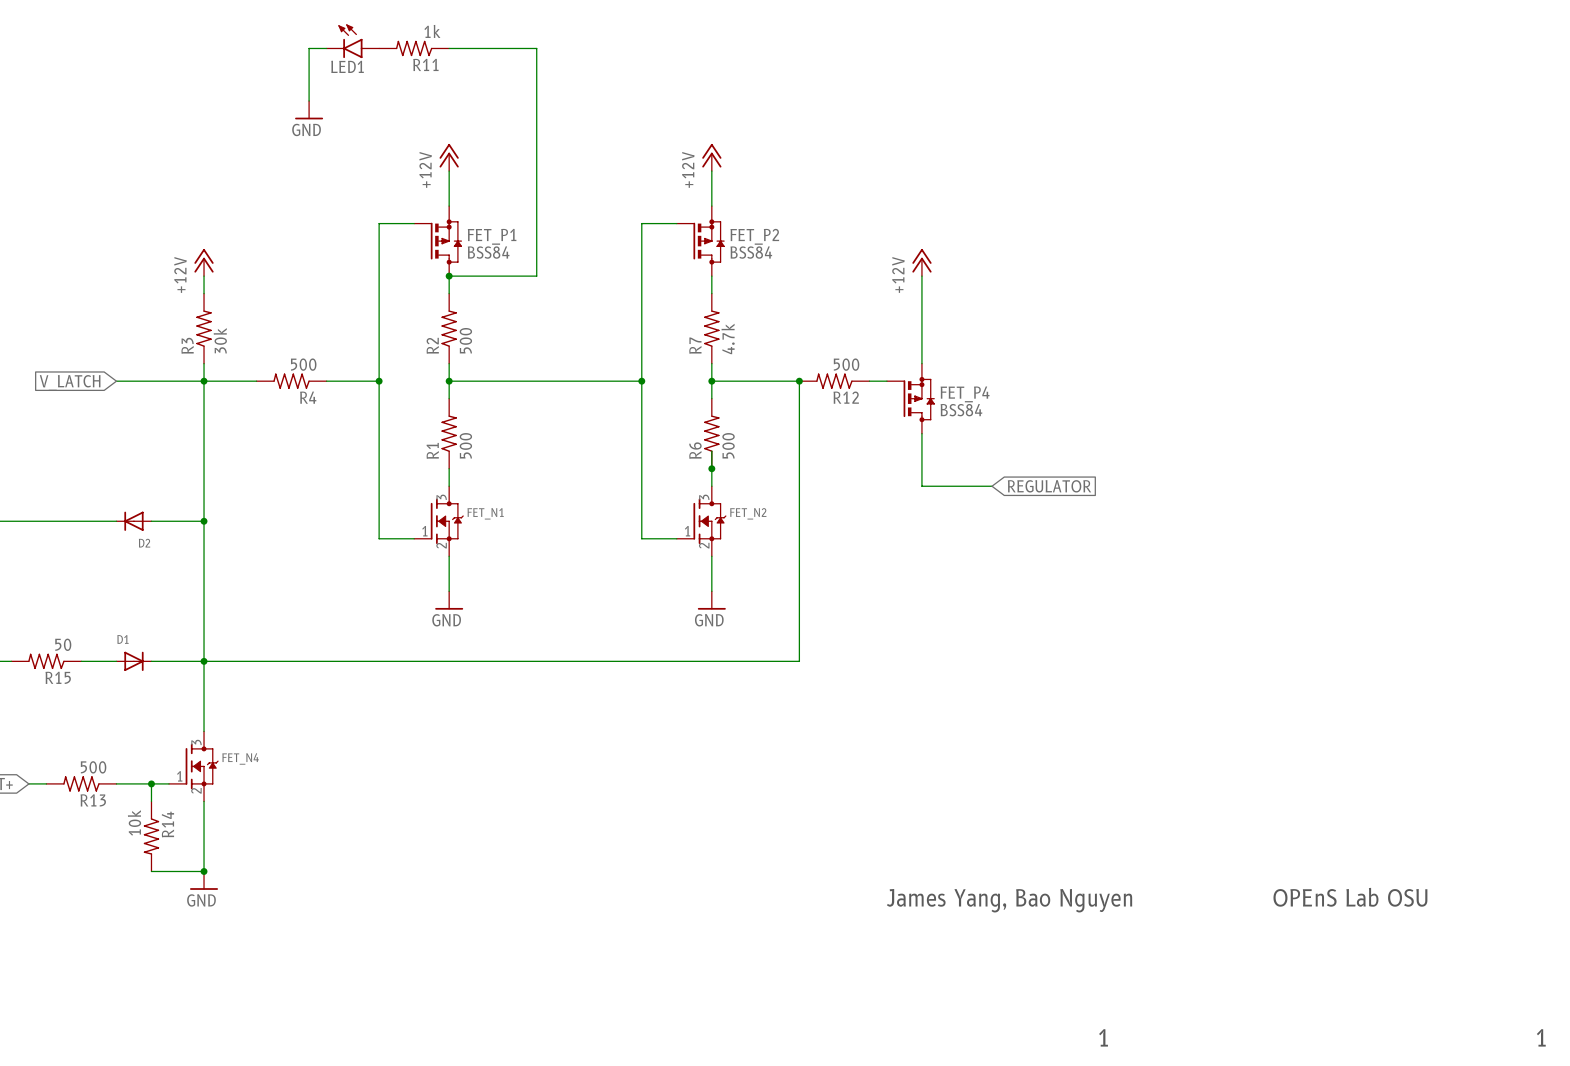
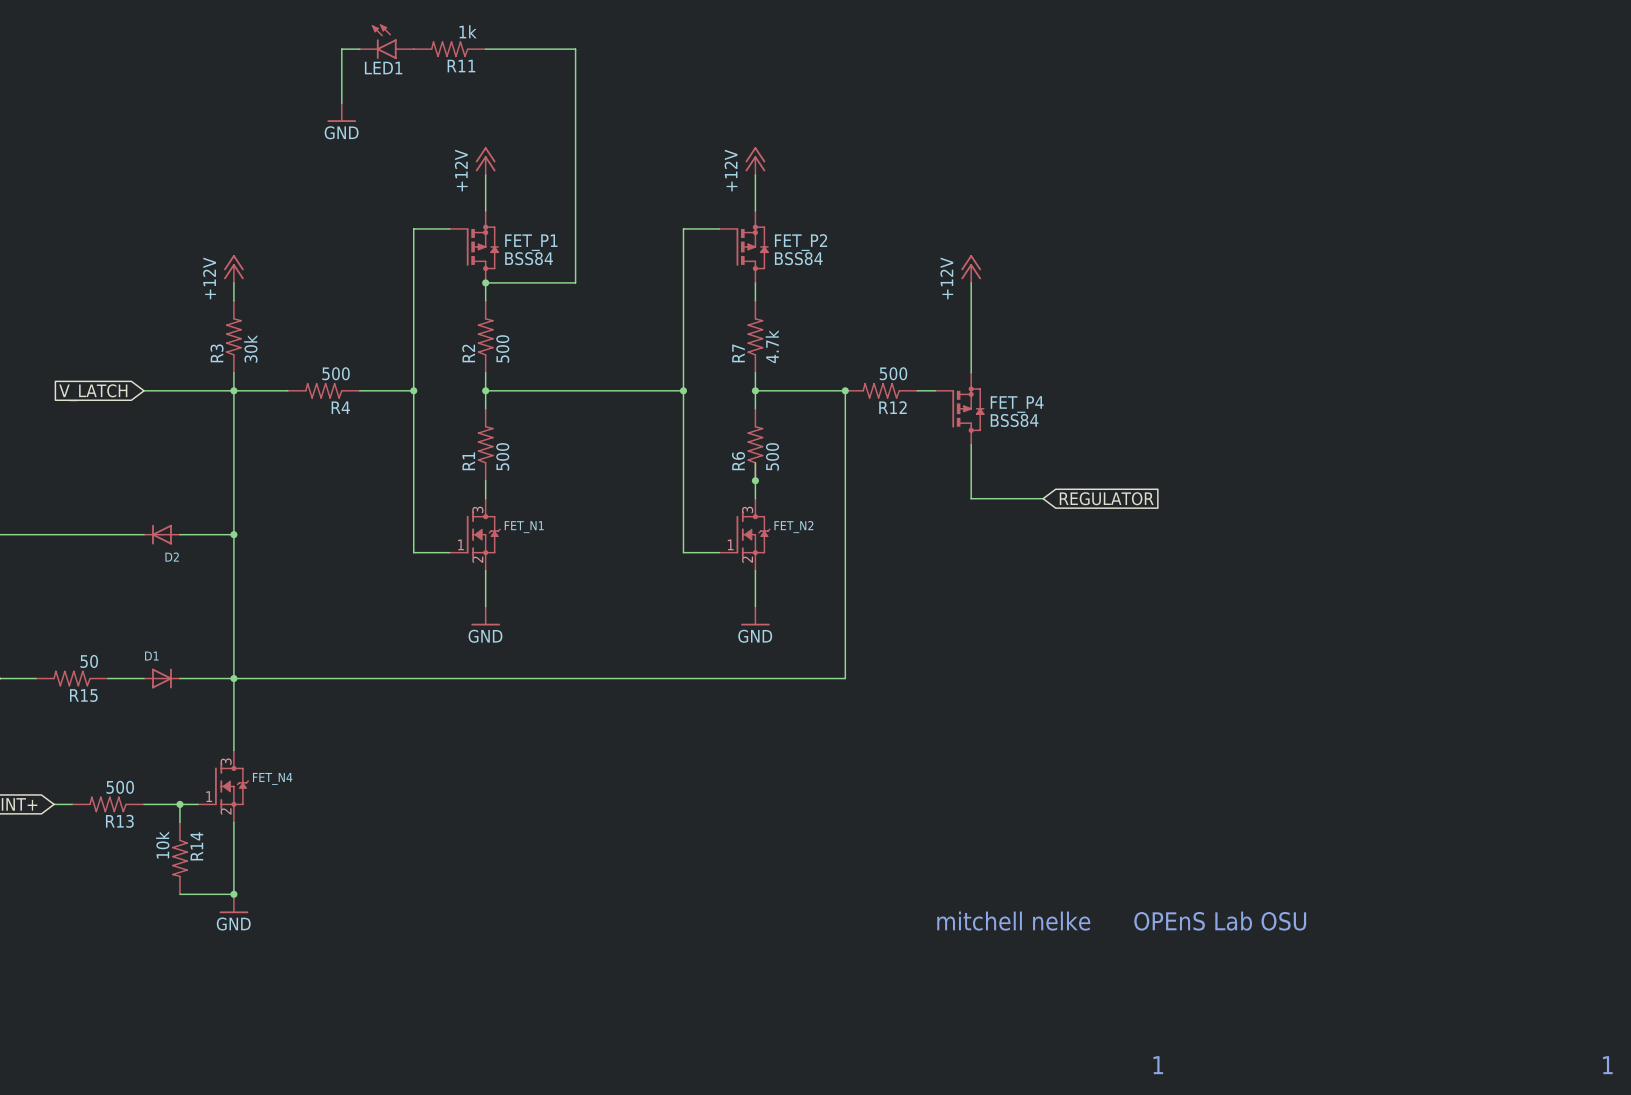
text: none -> OPEnS Lab OSU (1220, 921)
text: OPEnS Lab OSU (1350, 897) -> none
text: James Yang, Bao Nguyen (1009, 900) -> mitchell nelke (1013, 921)

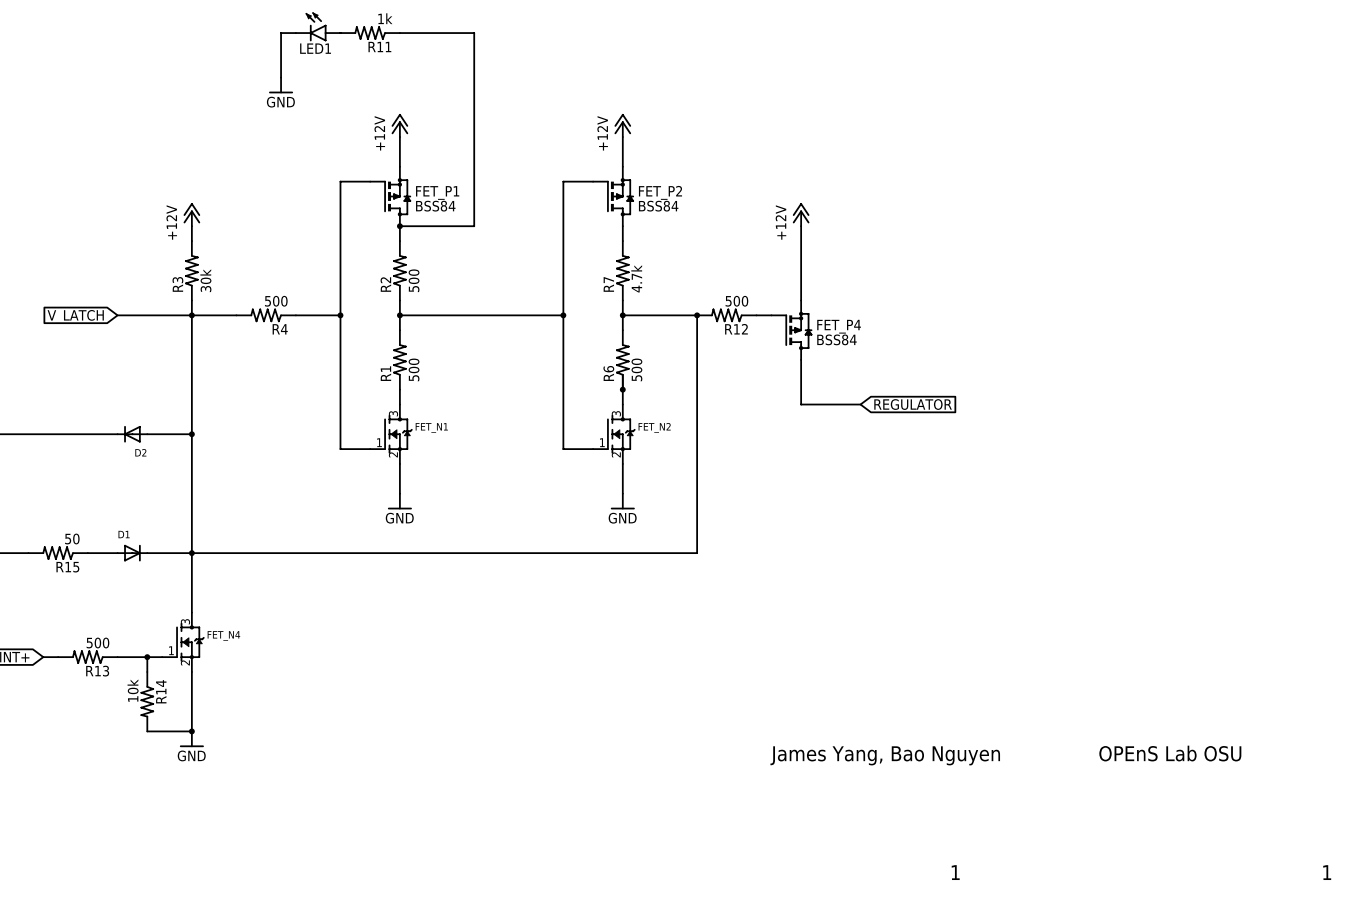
text: mitchell nelke (1013, 921) -> James Yang, Bao Nguyen (885, 755)
text: OPEnS Lab OSU (1220, 921) -> none
text: none -> OPEnS Lab OSU (1170, 753)

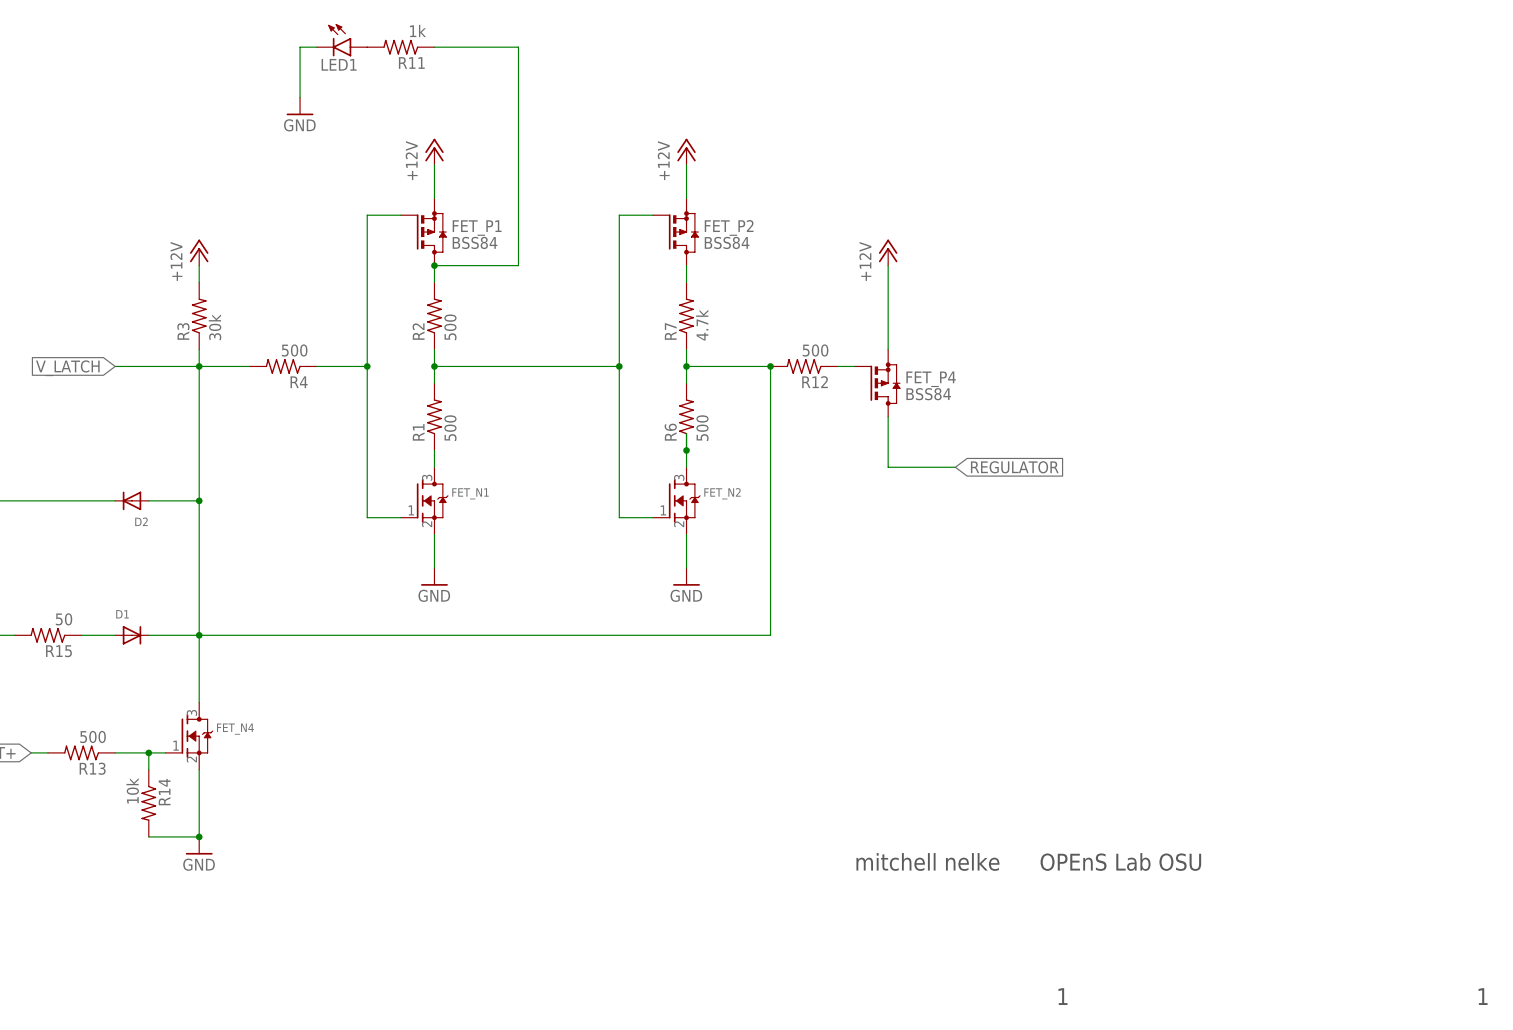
text: none -> OPEnS Lab OSU (1120, 861)
text: OPEnS Lab OSU (1170, 753) -> none
text: James Yang, Bao Nguyen (885, 755) -> mitchell nelke (927, 861)

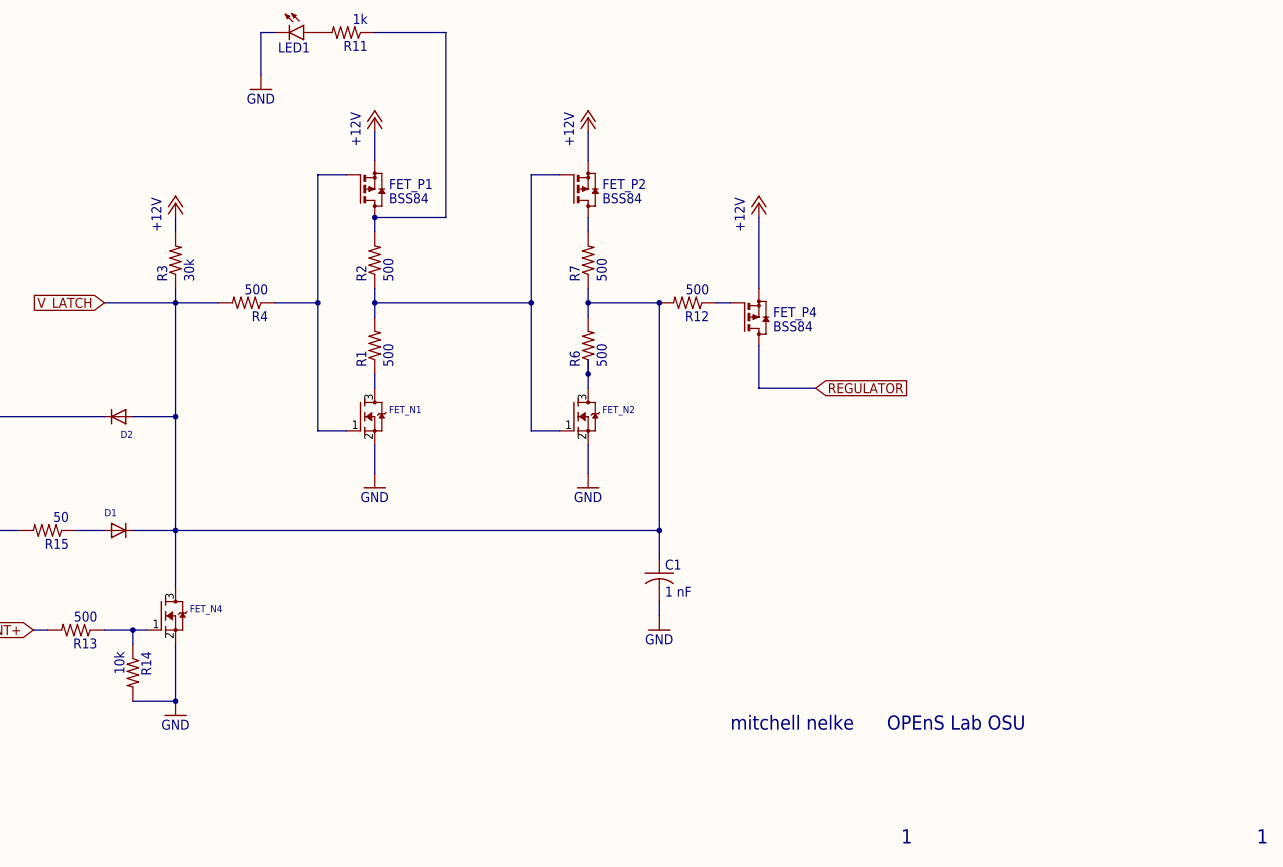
R7 value: 4.7k (702, 325) -> 500 (601, 269)
wire: none -> (659, 530) (659, 558)
junction: none -> (659, 530)
C1: none -> 1 nF (659, 580)
wire: none -> (659, 601) (659, 615)
power symbol: none -> GND (659, 623)

